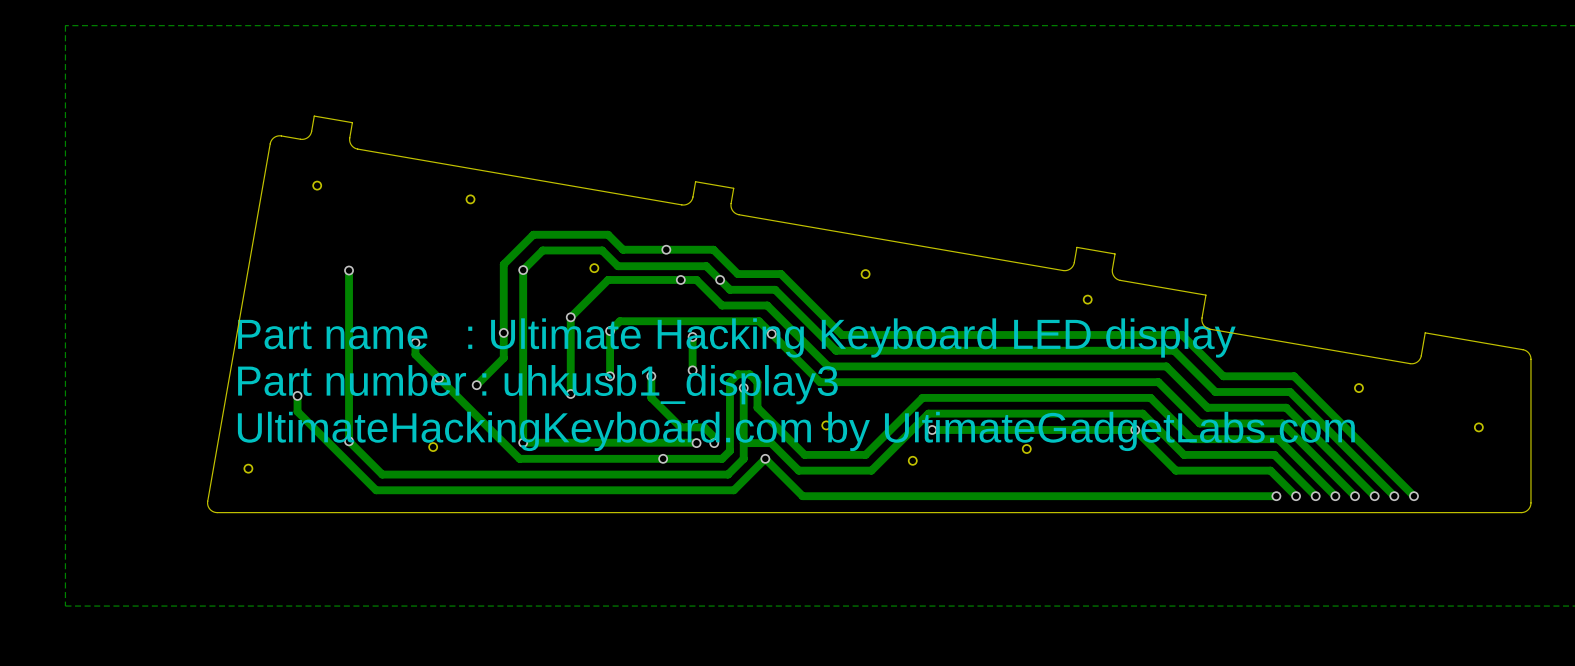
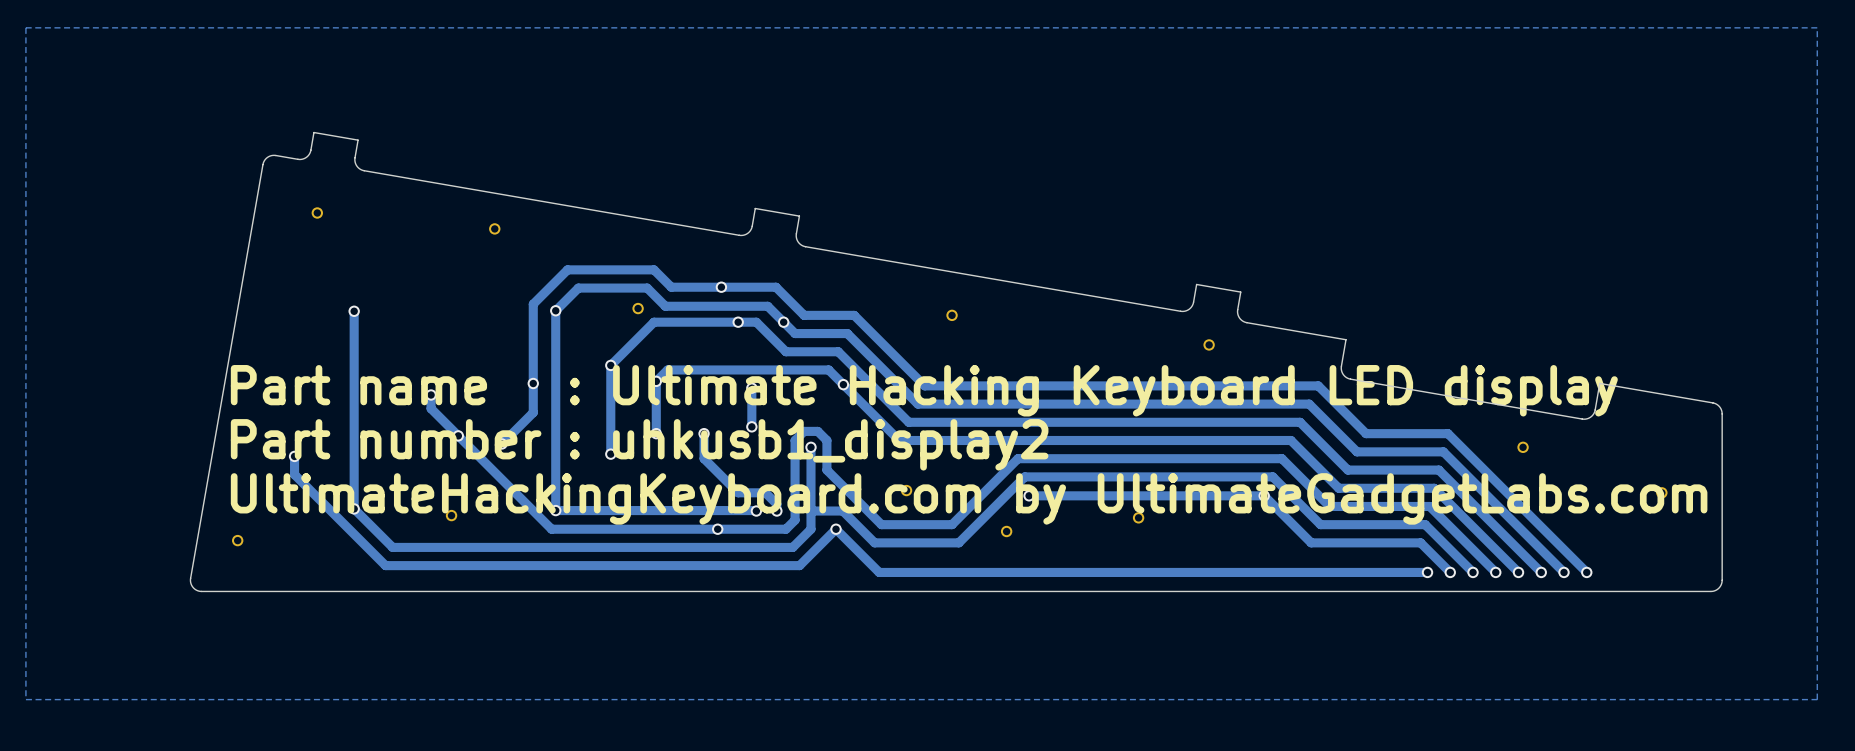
text: Part number : uhkusb1_display3 (537, 384) -> Part number : uhkusb1_display2 (639, 444)

